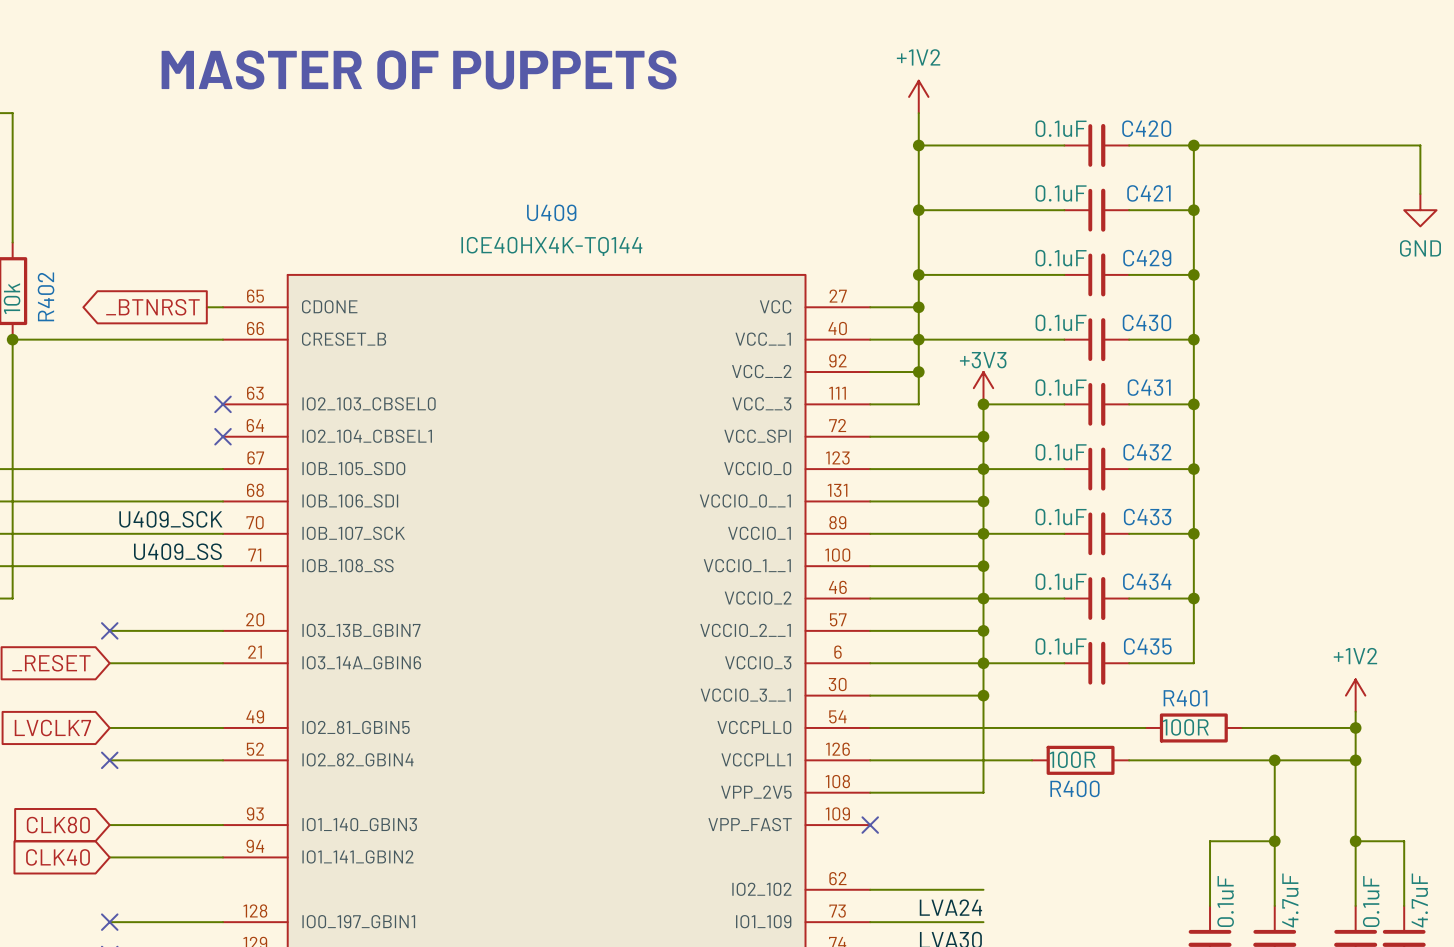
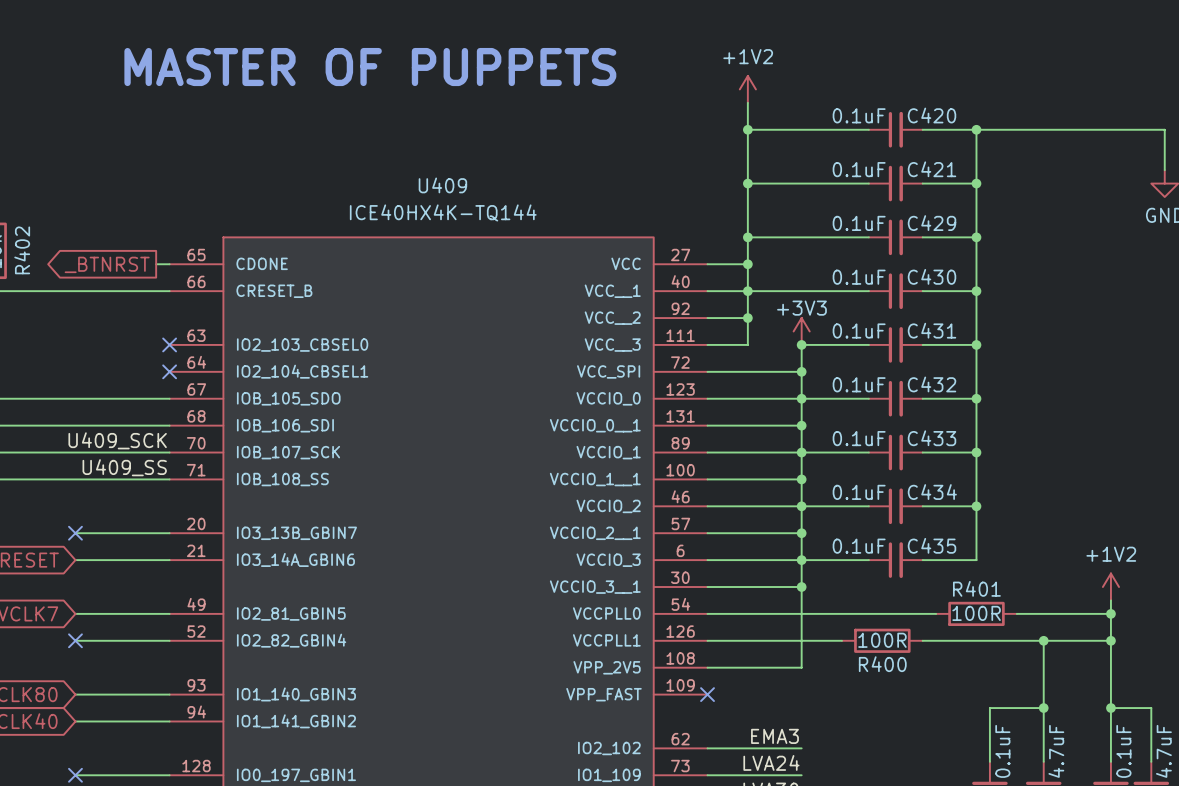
label: none -> EMA3 (774, 736)

